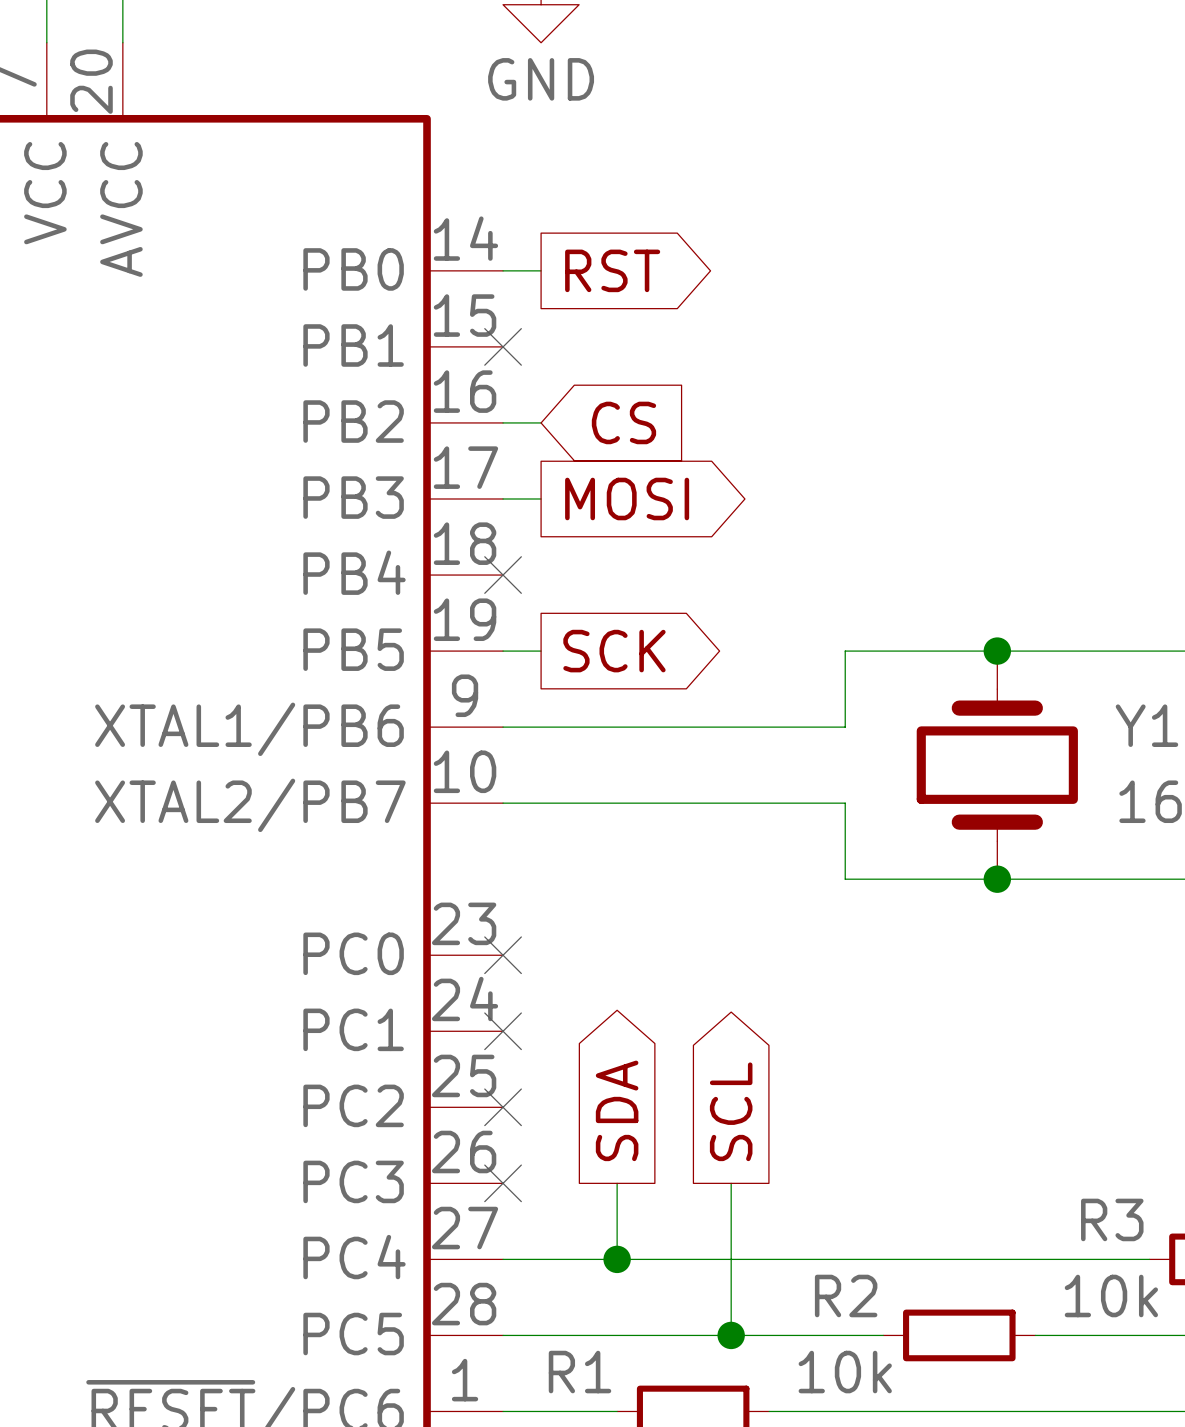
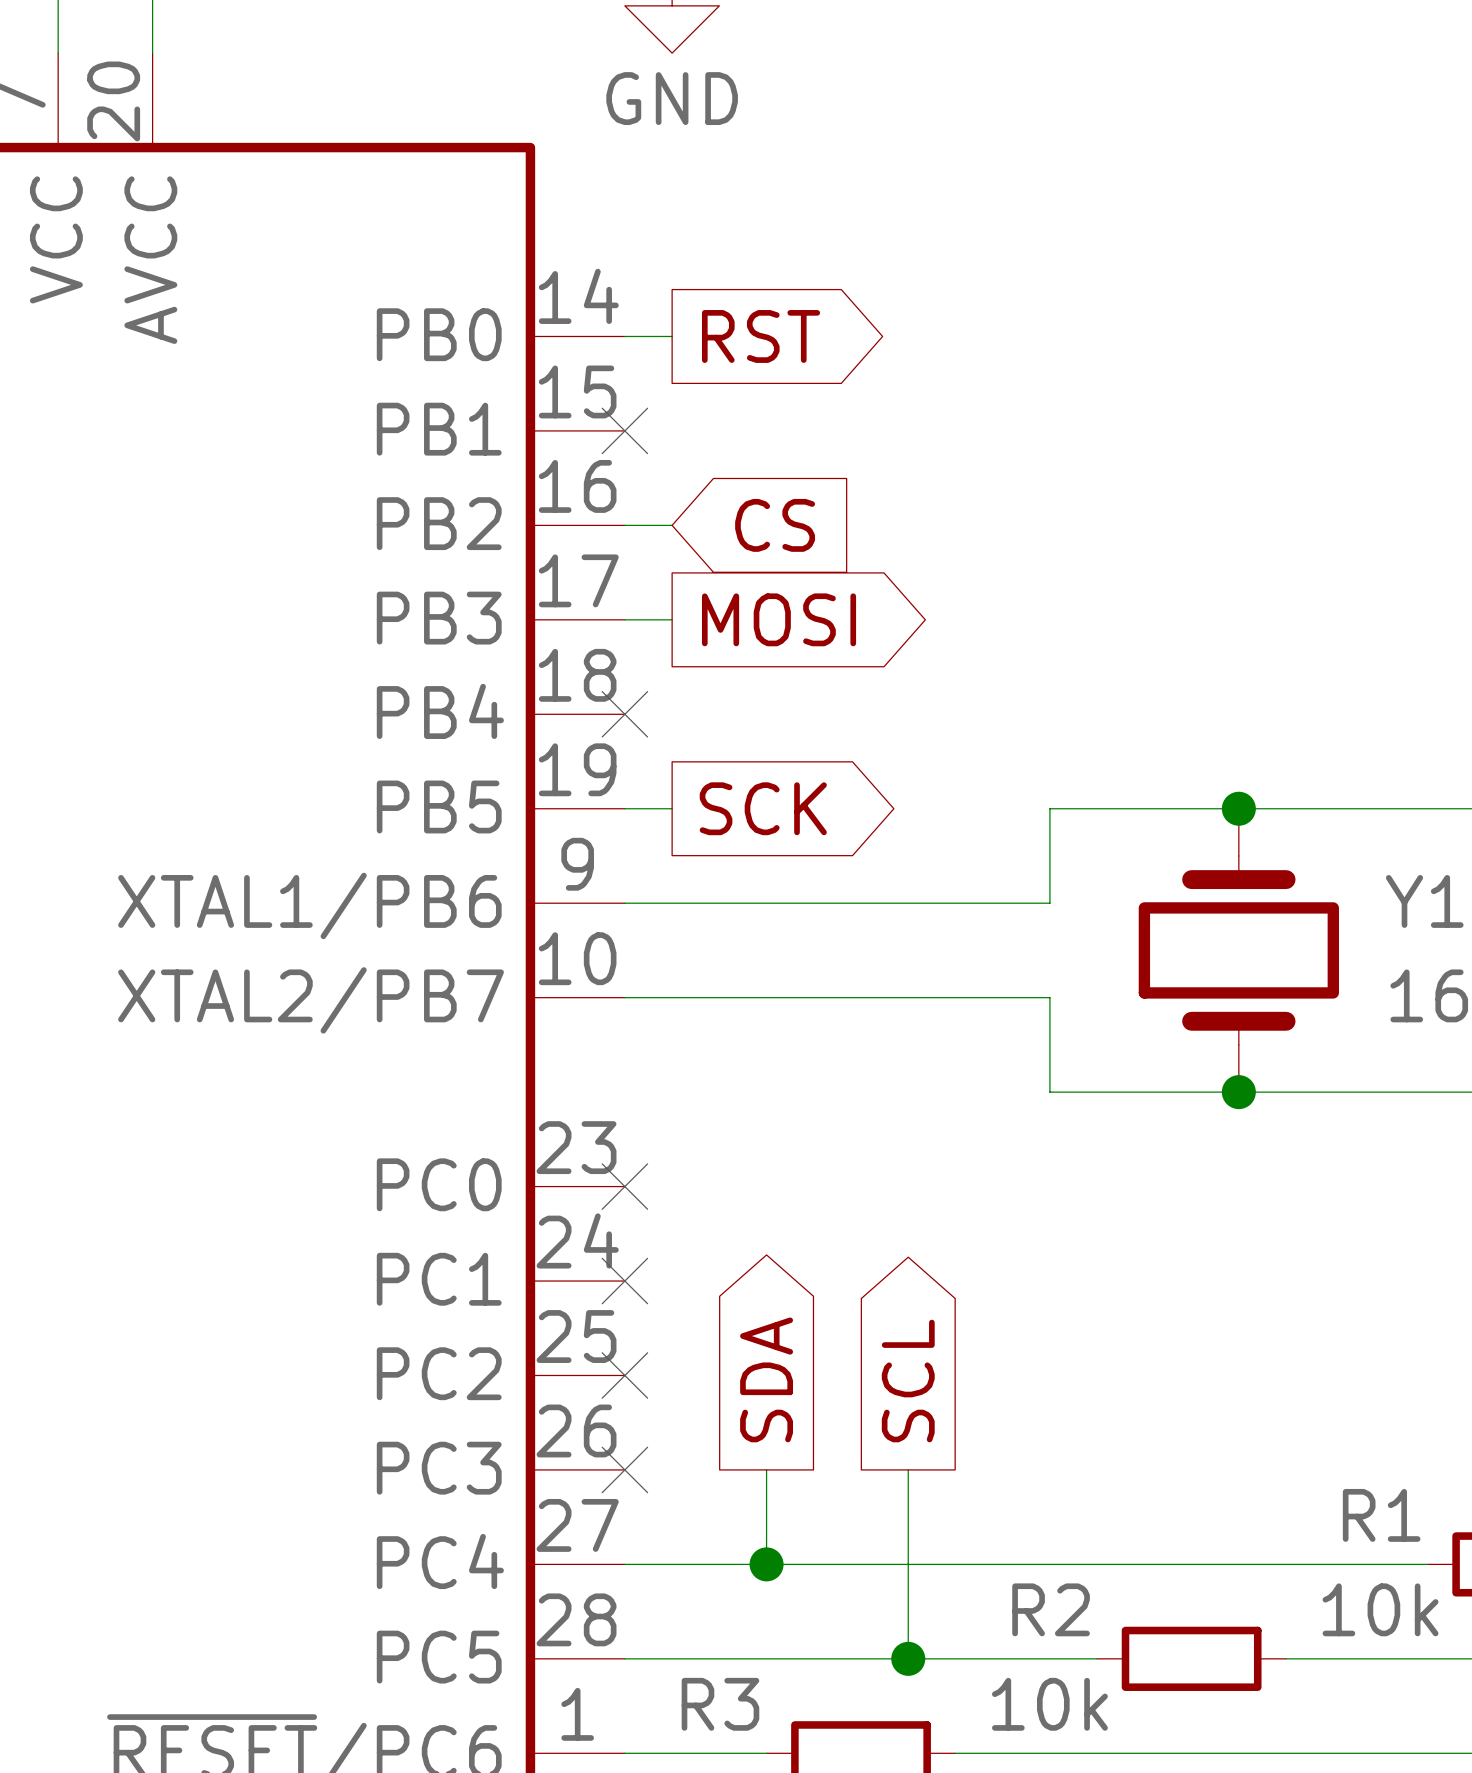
R3 name: R3 (1112, 1219) -> R1 (1381, 1515)
R1 name: R1 (580, 1372) -> R3 (720, 1704)

